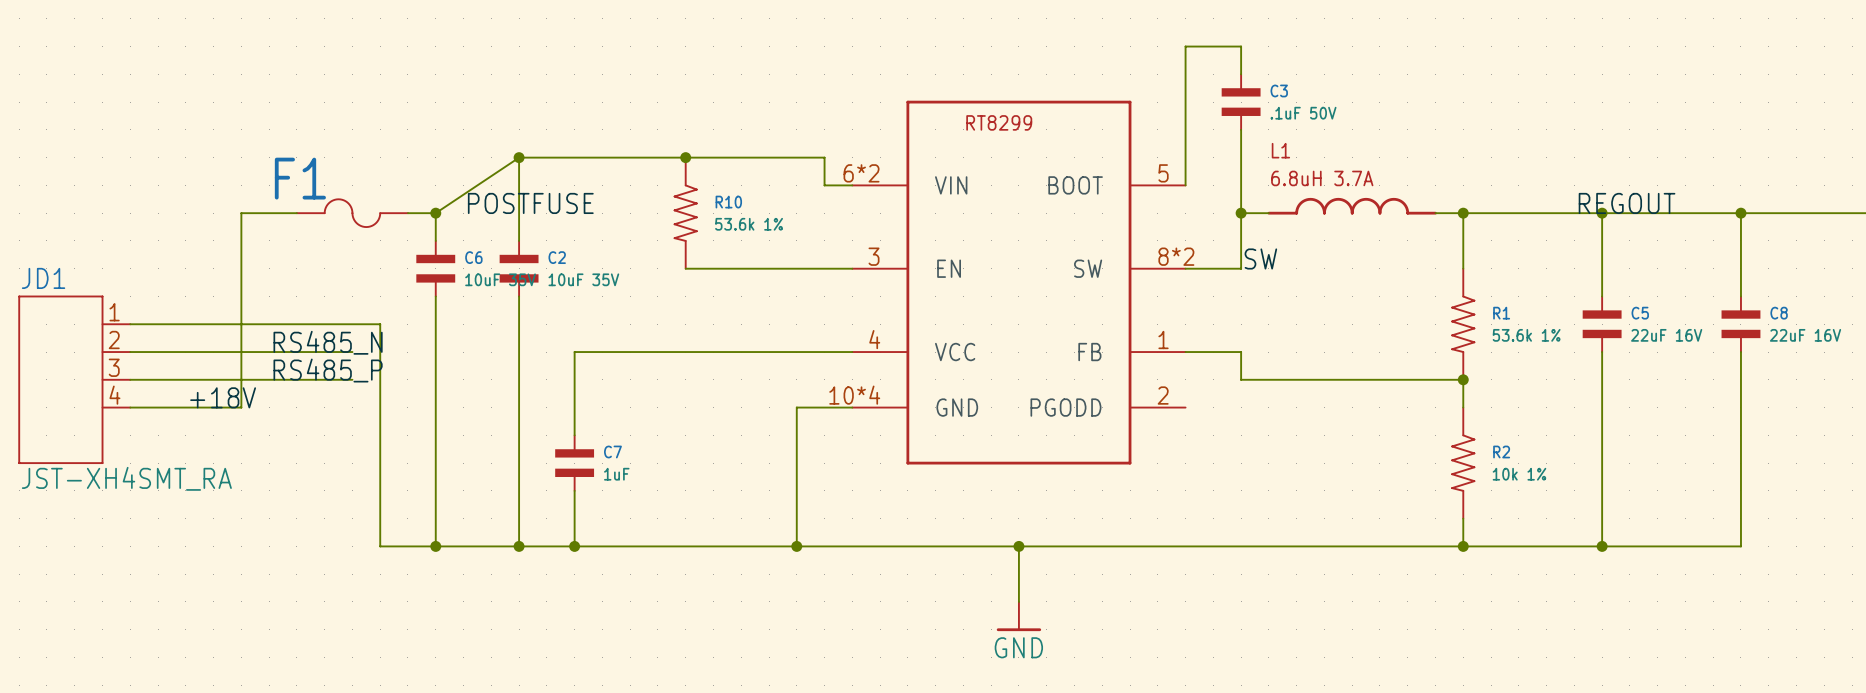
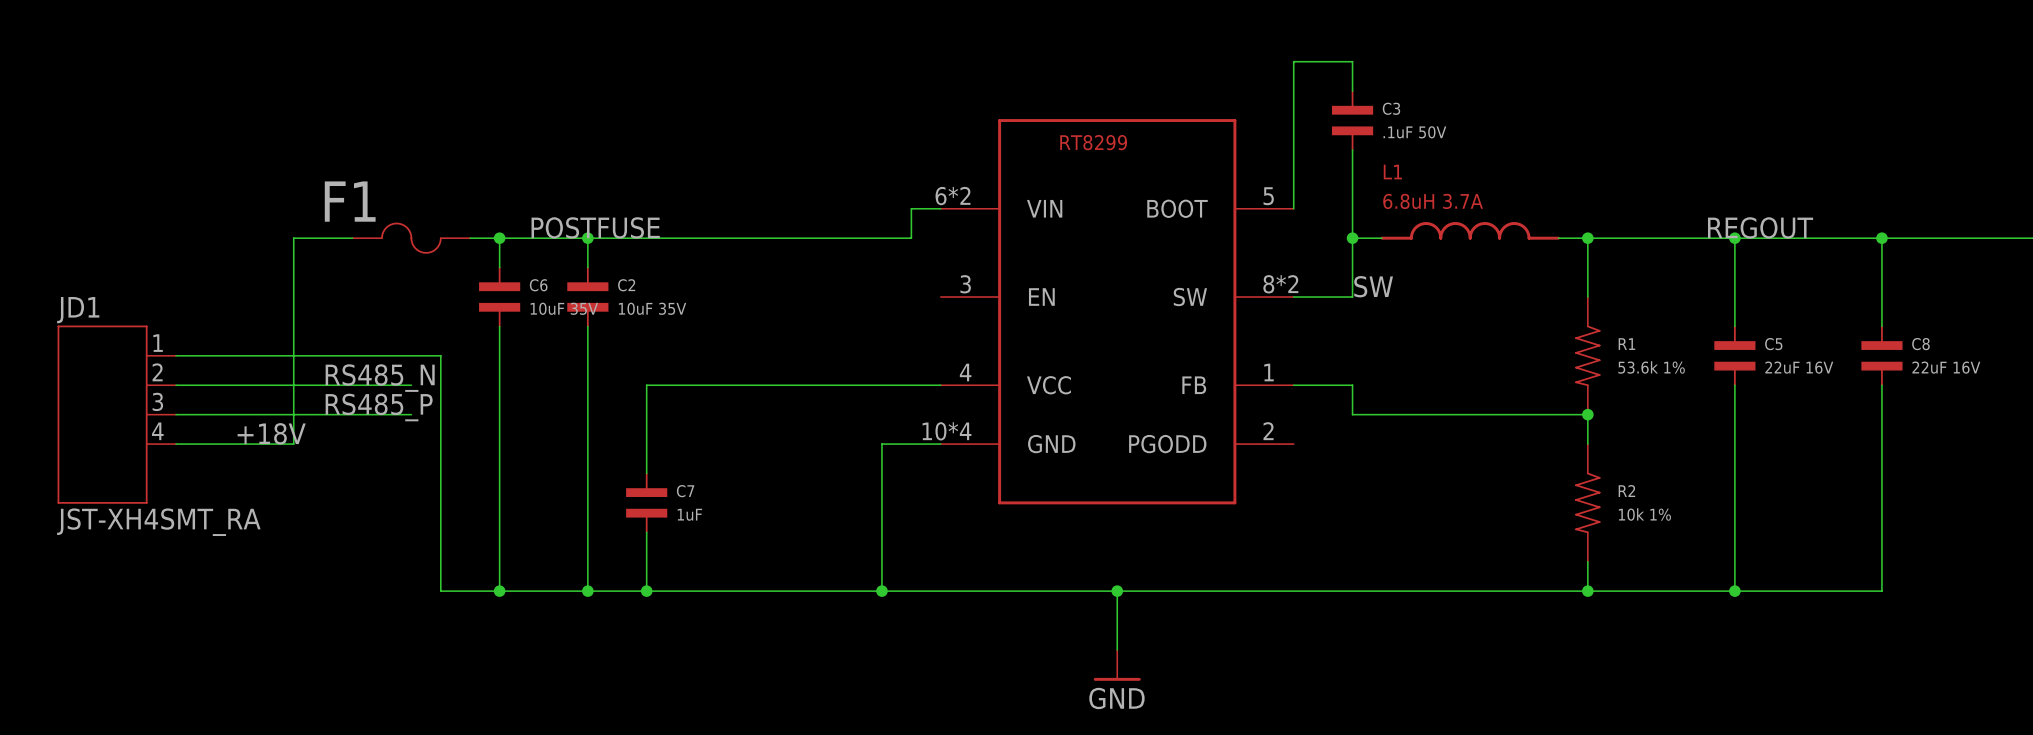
wire: (519, 157) (824, 157) (824, 185) -> (499, 238) (911, 238) (911, 208)
wire: (519, 157) (435, 213) -> none
wire: (519, 157) (519, 213) -> none
junction position: (519, 157) -> (587, 238)
junction: (685, 157) -> none
R10: 53.6k 1% (685, 213) -> none
wire: (685, 268) (852, 268) -> none

